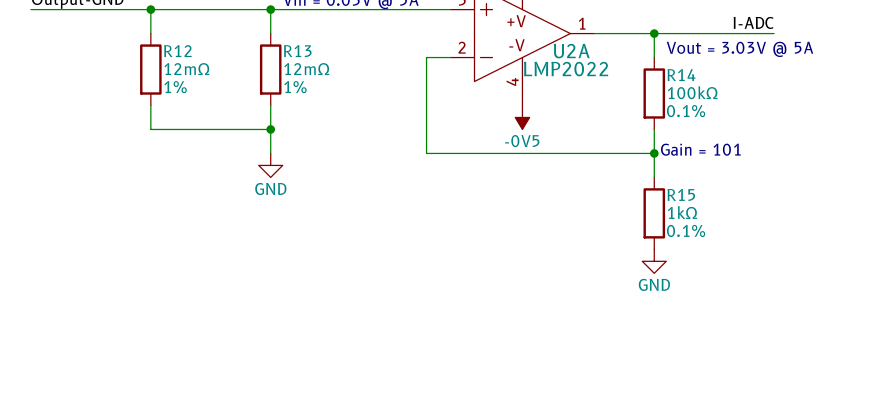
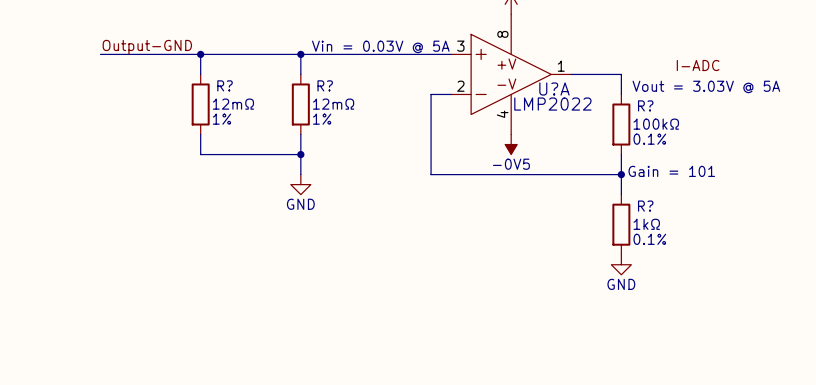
wire: (654, 33) (774, 33) -> none
junction: (654, 33) -> none
R12 name: R12 (177, 51) -> R? (225, 85)
R13 name: R13 (297, 51) -> R? (325, 85)
U2A name: U2A (571, 51) -> U?A (554, 89)
R14 name: R14 (681, 75) -> R? (645, 105)
R15 name: R15 (681, 194) -> R? (645, 206)

